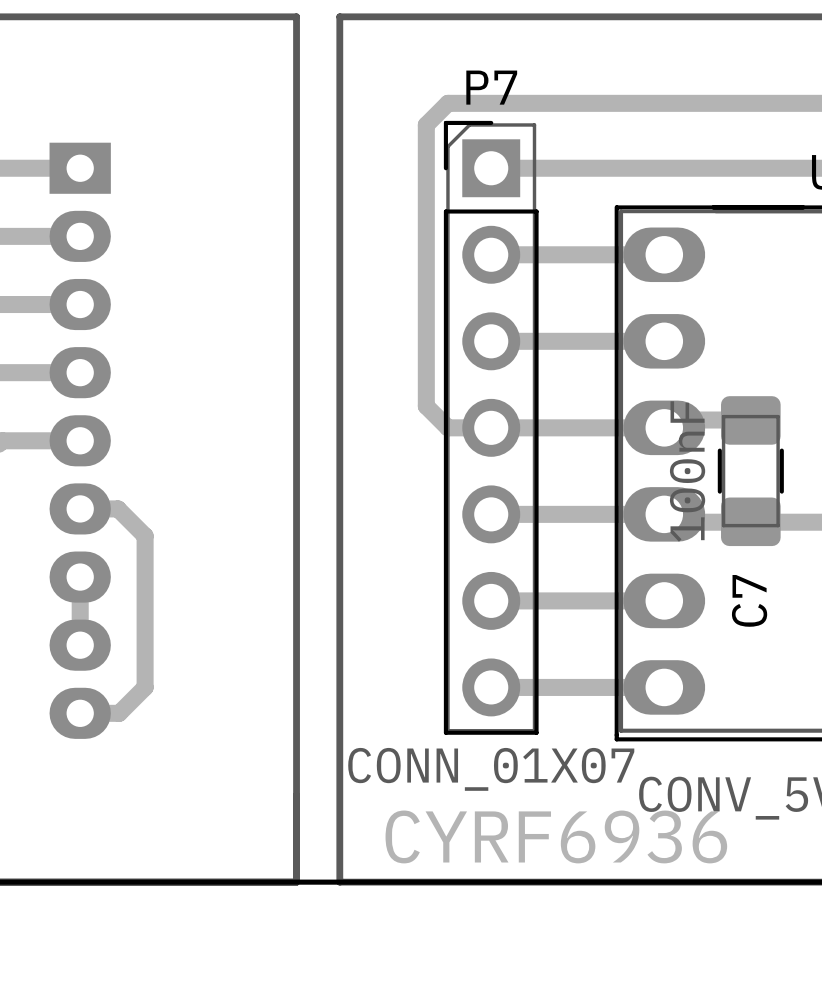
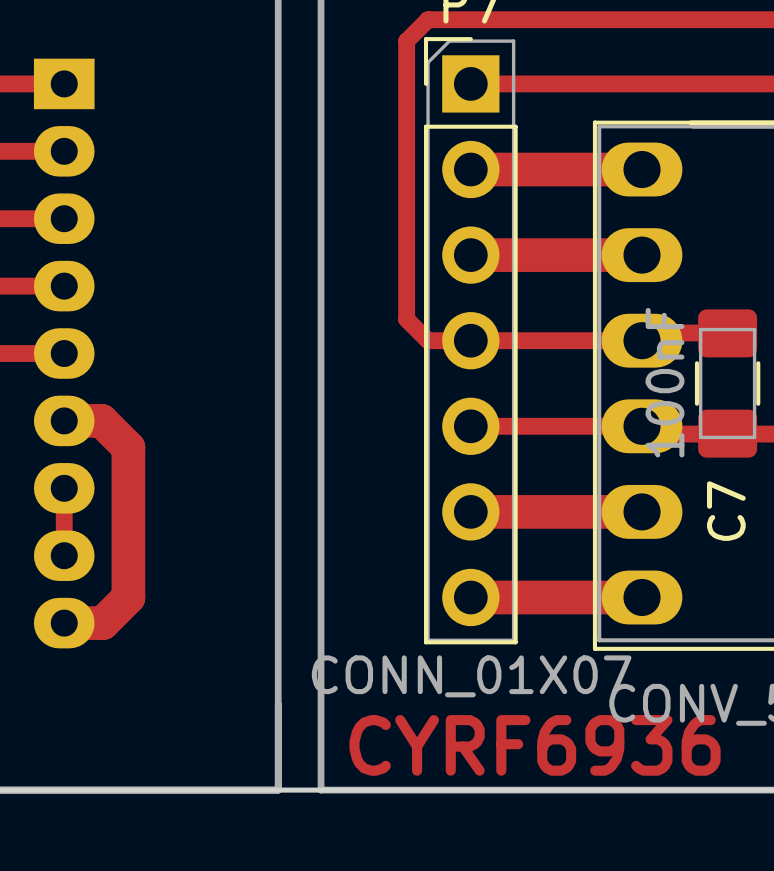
track width: thin (491, 254) (664, 254) -> thick (470, 169) (642, 169)
track width: thin (491, 341) (664, 341) -> thick (470, 255) (642, 255)
track width: thin (80, 508) (118, 508) (145, 536) (145, 687) (119, 713) (80, 713) -> thick (64, 420) (101, 420) (128, 447) (128, 597) (102, 623) (64, 623)
track width: thin (491, 600) (664, 600) -> thick (470, 511) (642, 511)
track width: thin (491, 687) (664, 687) -> thick (470, 597) (642, 597)

